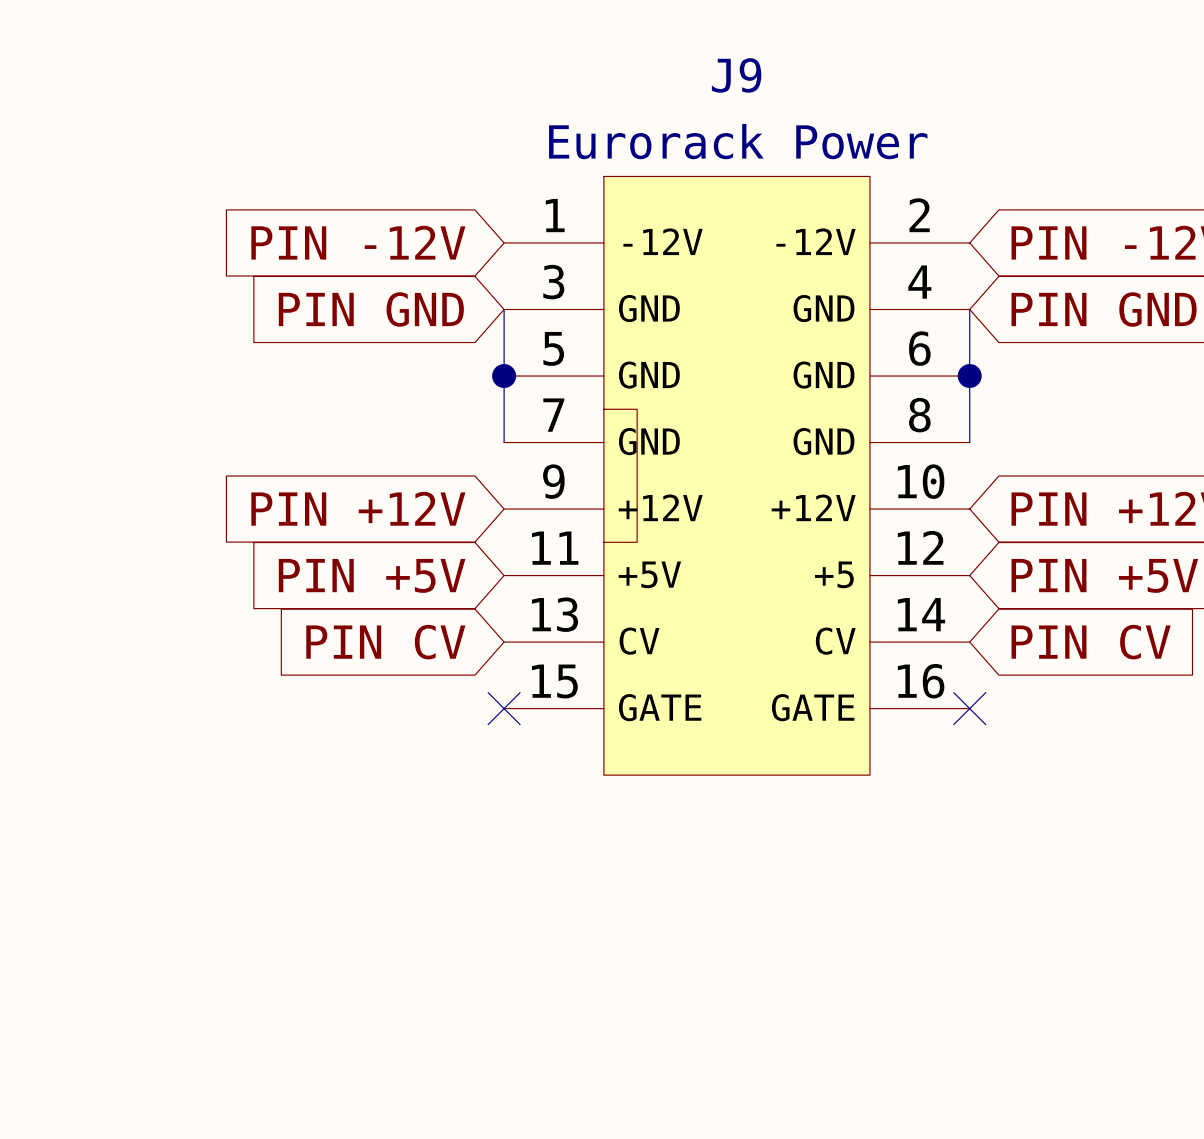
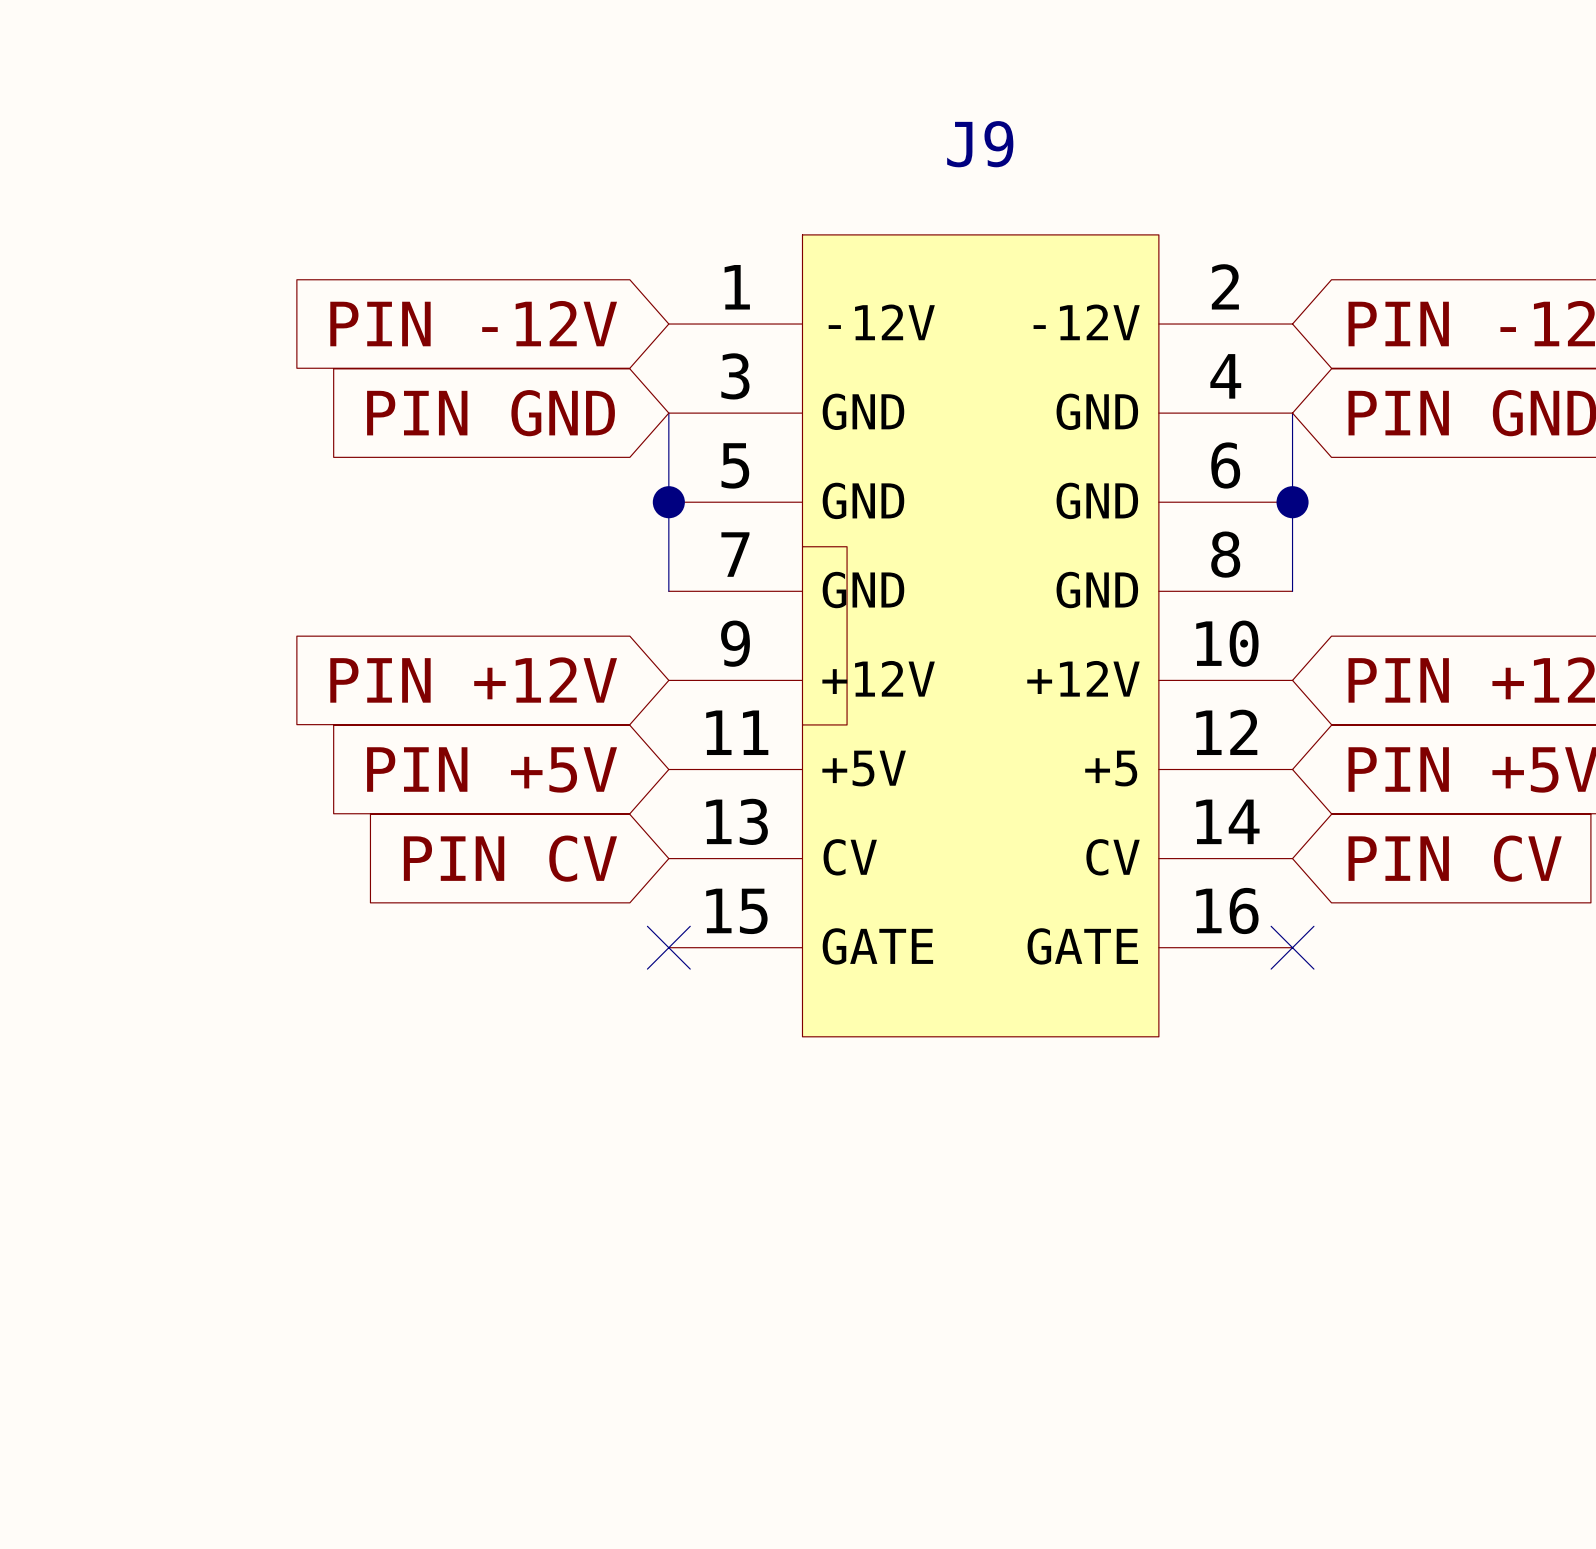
J9 name position: J9 (736, 75) -> J9 (980, 144)
J9 value: Eurorack Power (738, 141) -> none

